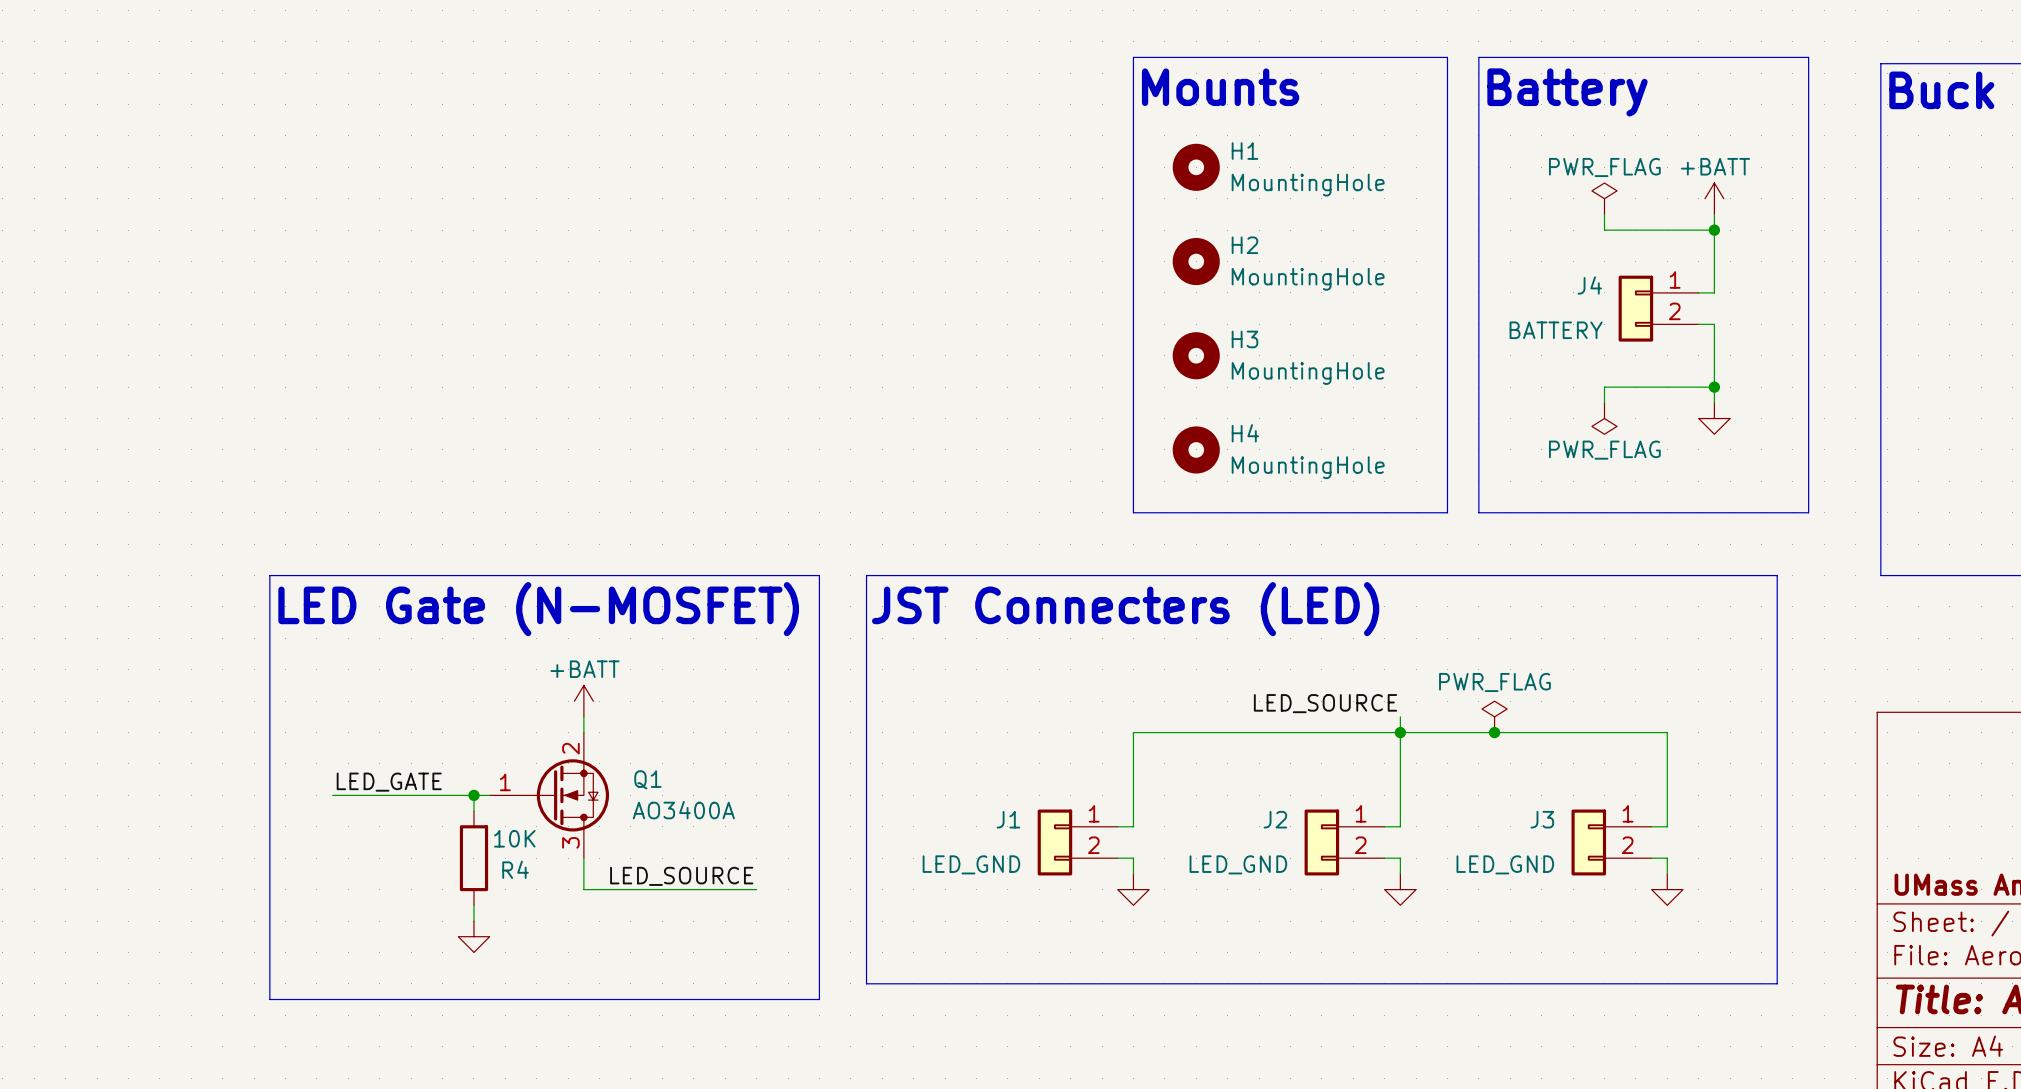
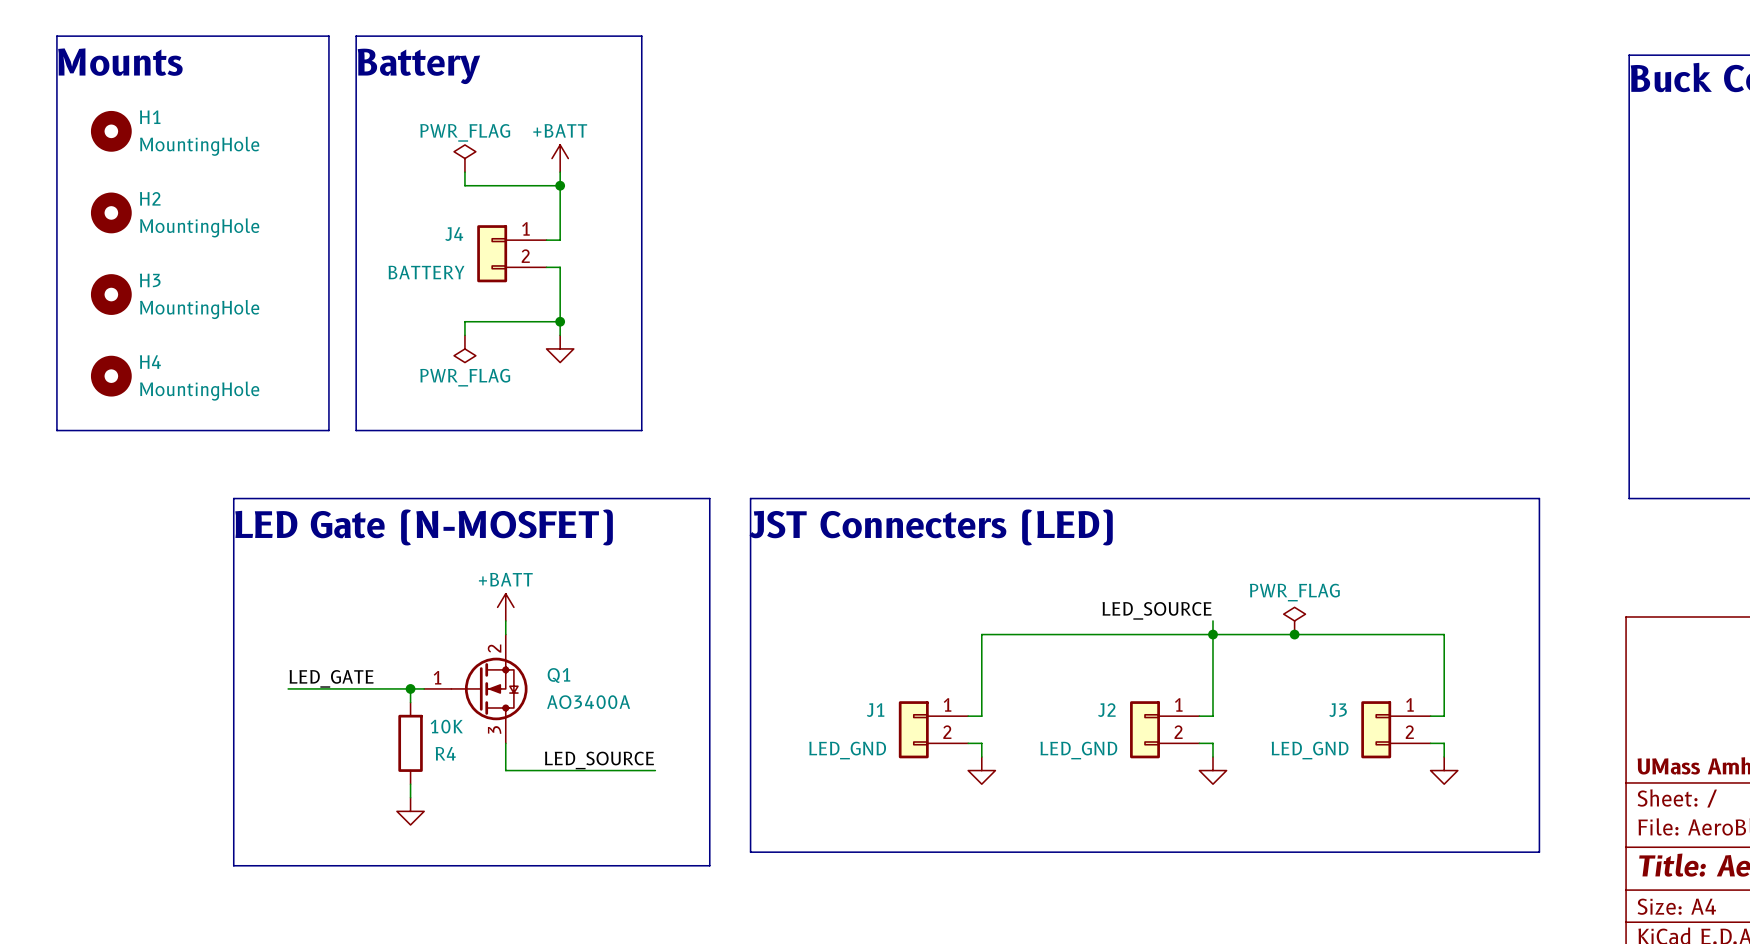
line: none -> (56, 36) (328, 36) (328, 430) (56, 430) (56, 36)
line: none -> (356, 36) (641, 36) (641, 430) (356, 430) (356, 36)
line: (1133, 57) (1447, 57) (1447, 512) (1133, 512) (1133, 57) -> none
line: (1478, 57) (1808, 57) (1808, 512) (1478, 512) (1478, 57) -> none
text: none -> Mounts (120, 62)
text: none -> Battery (418, 66)
text: Mounts (1220, 87) -> none
text: Battery (1567, 92) -> none
H1 position: (1196, 167) -> (111, 131)
power symbol: none -> PWR_FLAG (464, 158)
power symbol: none -> +BATT (560, 158)
wire: none -> (464, 172) (464, 185) (560, 185)
wire: none -> (560, 172) (560, 240) (546, 240)
power symbol: PWR_FLAG (1604, 198) -> none
power symbol: +BATT (1714, 198) -> none
junction: none -> (560, 185)
wire: (1604, 214) (1604, 230) (1714, 230) -> none
wire: (1714, 214) (1714, 292) (1698, 292) -> none
junction: (1714, 230) -> none
H2 position: (1196, 261) -> (111, 212)
wire: none -> (546, 267) (560, 267) (560, 335)
J4 position: (1658, 308) -> (511, 253)
wire: (1698, 324) (1714, 324) (1714, 402) -> none
H3 position: (1196, 355) -> (111, 294)
wire: none -> (560, 321) (464, 321) (464, 335)
junction: none -> (560, 321)
wire: (1714, 387) (1604, 387) (1604, 402) -> none
junction: (1714, 387) -> none
power symbol: none -> PWR_FLAG (464, 348)
power symbol: none -> (560, 348)
power symbol: PWR_FLAG (1604, 418) -> none
power symbol: (1714, 418) -> none
H4 position: (1196, 449) -> (111, 376)

